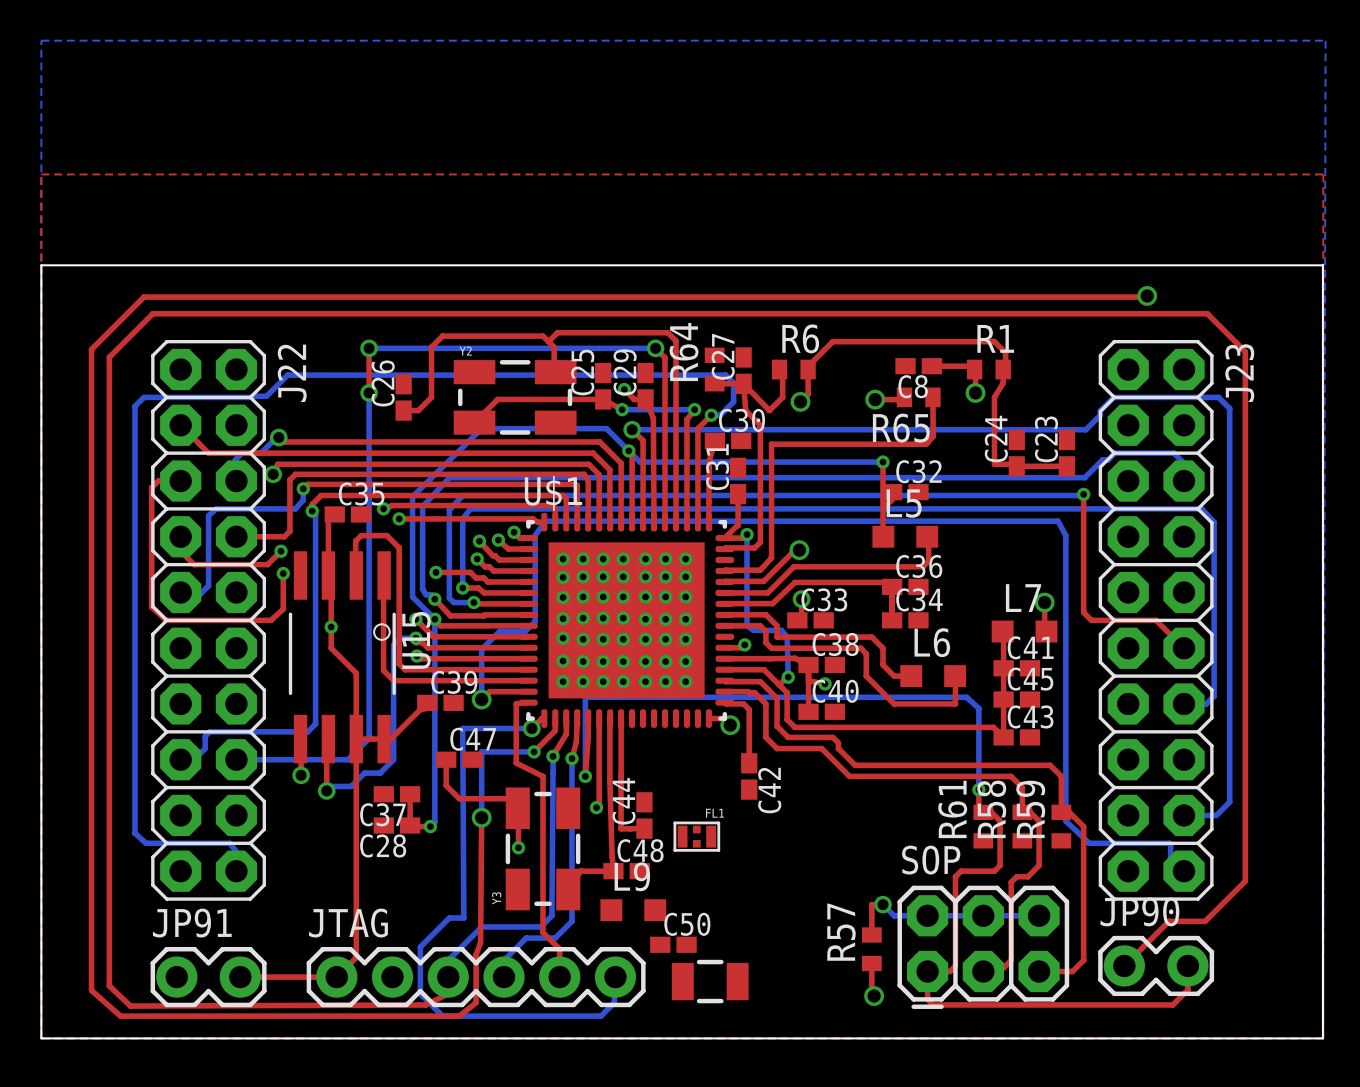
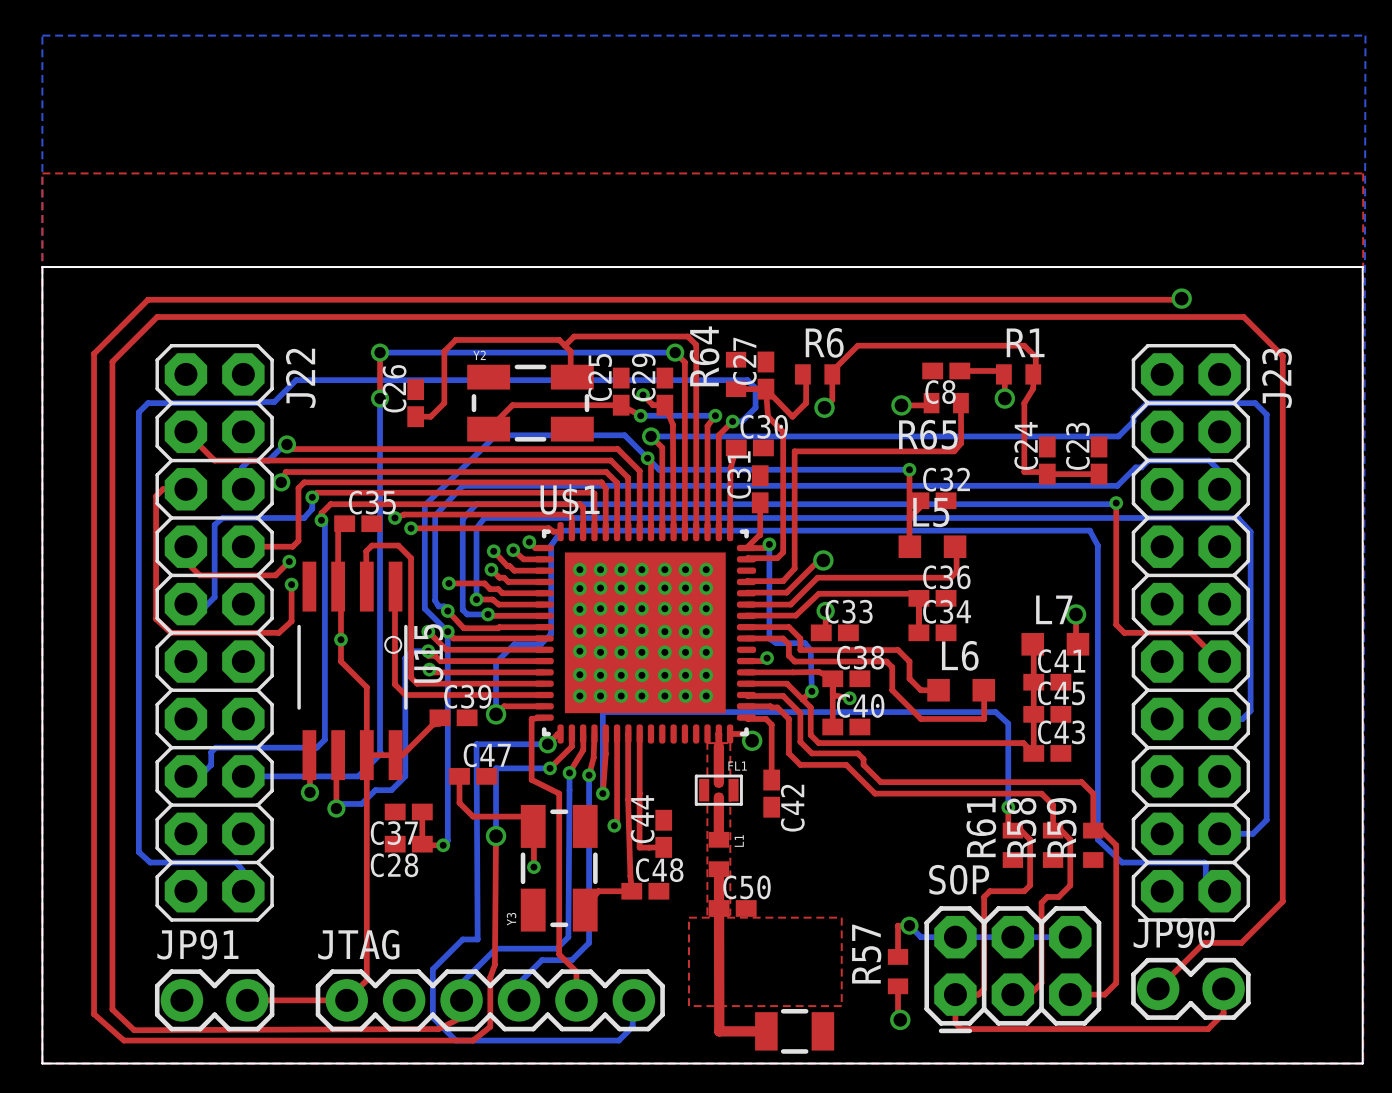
top track: none -> (718, 734) (718, 782)
top zone outline: none -> (707, 743) (730, 743) (730, 915) (707, 915) (707, 743)
top track: none -> (718, 797) (718, 839)
L1: none -> (718, 854)
FL1 position: (696, 836) -> (718, 790)
top track: none -> (719, 869) (719, 1031) (766, 1031)
top zone outline: none -> (688, 917) (841, 917) (841, 1006) (688, 1006) (688, 917)
L9: (633, 910) -> none
C50 position: (673, 944) -> (732, 908)
part position: (710, 981) -> (794, 1031)

